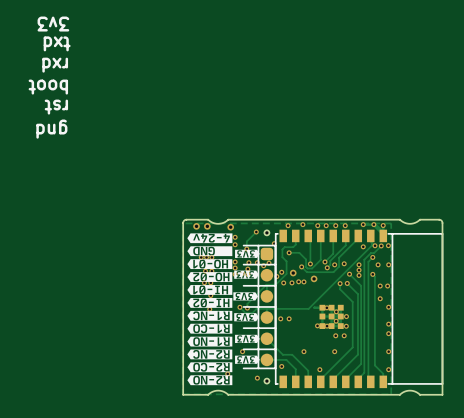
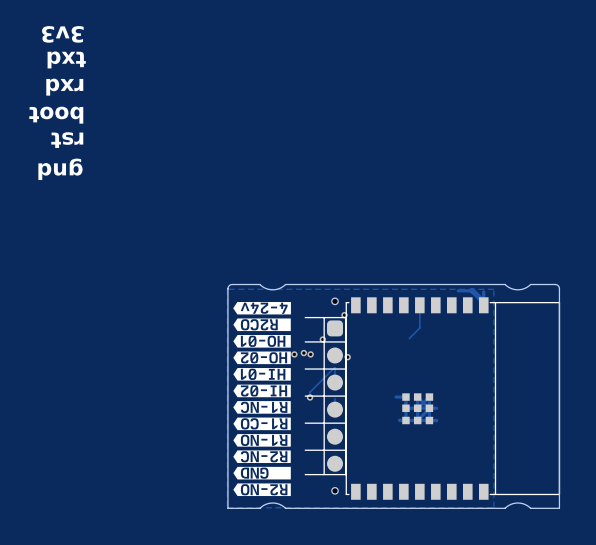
via: (302, 224) -> none
via: (363, 224) -> none
via: (373, 224) -> none
via: (288, 225) -> none
via: (317, 225) -> none
via: (326, 225) -> none
via: (335, 225) -> none
via: (345, 225) -> none
via: (383, 225) -> none
via: (196, 226) -> none
via: (207, 226) -> none
via: (230, 227) -> none
track: (256, 232) (246, 241) (246, 248) -> none
via: (256, 232) -> none
track: (295, 235) (295, 244) (293, 247) (284, 247) (282, 249) (282, 257) (286, 261) (286, 273) (275, 284) (266, 284) -> none
track: (320, 235) (320, 259) (312, 268) (306, 267) (306, 259) (299, 252) (289, 252) -> none
track: (345, 235) (345, 245) (330, 260) (330, 264) (327, 267) -> none
track: (358, 235) (358, 238) (339, 257) (339, 266) (333, 272) (306, 272) (301, 266) -> none
via: (235, 237) -> none
track: (306, 240) (308, 235) (310, 238) (310, 263) -> none
via: (235, 244) -> none
track: (375, 245) (370, 241) (370, 235) (371, 236) (371, 245) (308, 308) (256, 308) (252, 313) (245, 313) (239, 307) -> none
via: (375, 245) -> none
track: (381, 245) (364, 259) (364, 372) (358, 378) (358, 381) -> none
via: (381, 245) -> none
via: (388, 245) -> none
drawing: none -> [233, 318, 291, 332]
via: (363, 246) -> none
via: (246, 248) -> none
drawing: [235, 249, 260, 258] -> none
drawing position: (209, 251) -> (262, 473)
via: (289, 252) -> none
via: (201, 257) -> none
via: (206, 257) -> none
via: (211, 257) -> none
track: (372, 257) (368, 261) (368, 379) (370, 381) -> none
via: (372, 257) -> none
via: (235, 262) -> none
via: (248, 262) -> none
via: (325, 262) -> none
via: (269, 263) -> none
via: (310, 263) -> none
via: (344, 263) -> none
via: (334, 264) -> none
via: (359, 264) -> none
via: (378, 264) -> none
via: (388, 264) -> none
via: (263, 265) -> none
via: (301, 266) -> none
via: (327, 267) -> none
via: (235, 268) -> none
via: (247, 269) -> none
drawing: [234, 270, 259, 279] -> none
via: (359, 270) -> none
via: (205, 271) -> none
via: (211, 271) -> none
via: (281, 272) -> none
via: (293, 273) -> none
track: (349, 274) (361, 285) (361, 363) (345, 379) (345, 381) -> none
via: (349, 274) -> none
track: (372, 274) (374, 276) (374, 365) (383, 373) (383, 381) -> none
via: (372, 274) -> none
via: (359, 275) -> none
via: (314, 278) -> none
via: (298, 281) -> none
via: (303, 281) -> none
via: (204, 282) -> none
via: (210, 282) -> none
via: (283, 282) -> none
via: (291, 282) -> none
track: (340, 283) (340, 289) (352, 301) (352, 347) (320, 379) (320, 381) -> none
via: (340, 283) -> none
track: (347, 283) (357, 294) (357, 354) (333, 379) (333, 381) -> none
via: (347, 283) -> none
via: (380, 286) -> none
via: (387, 286) -> none
drawing: [233, 292, 259, 301] -> none
via: (210, 295) -> none
via: (380, 298) -> none
via: (239, 307) -> none
via: (326, 307) -> none
via: (388, 307) -> none
via: (209, 309) -> none
via: (336, 311) -> none
drawing: [234, 313, 259, 322] -> none
via: (346, 316) -> none
via: (280, 318) -> none
via: (289, 318) -> none
via: (336, 321) -> none
via: (388, 324) -> none
via: (317, 325) -> none
via: (327, 326) -> none
via: (346, 326) -> none
via: (388, 333) -> none
drawing: [235, 334, 260, 344] -> none
via: (335, 335) -> none
via: (344, 335) -> none
track: (266, 338) (282, 354) (292, 354) (308, 370) (308, 381) -> none
via: (242, 351) -> none
via: (303, 351) -> none
via: (334, 351) -> none
via: (388, 351) -> none
drawing: [187, 355, 260, 373] -> none
track: (266, 359) (286, 359) (295, 369) (295, 381) -> none
via: (281, 366) -> none
via: (319, 369) -> none
via: (388, 369) -> none
via: (227, 373) -> none
via: (257, 378) -> none

